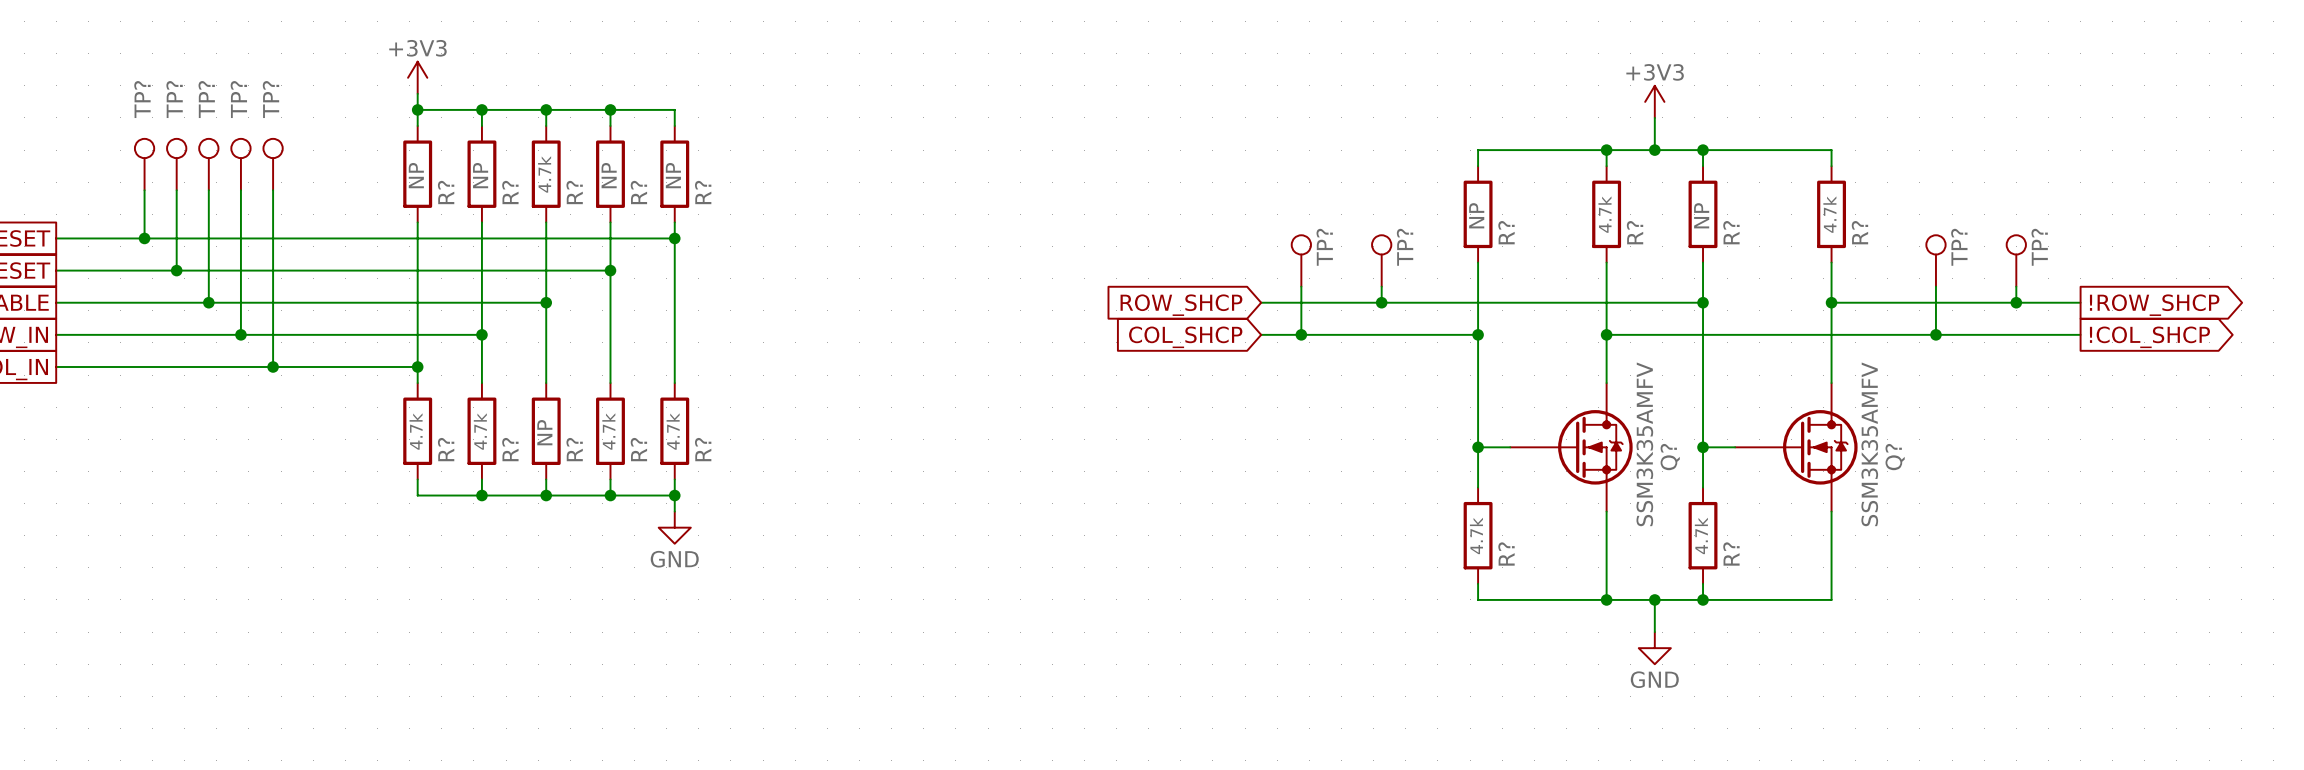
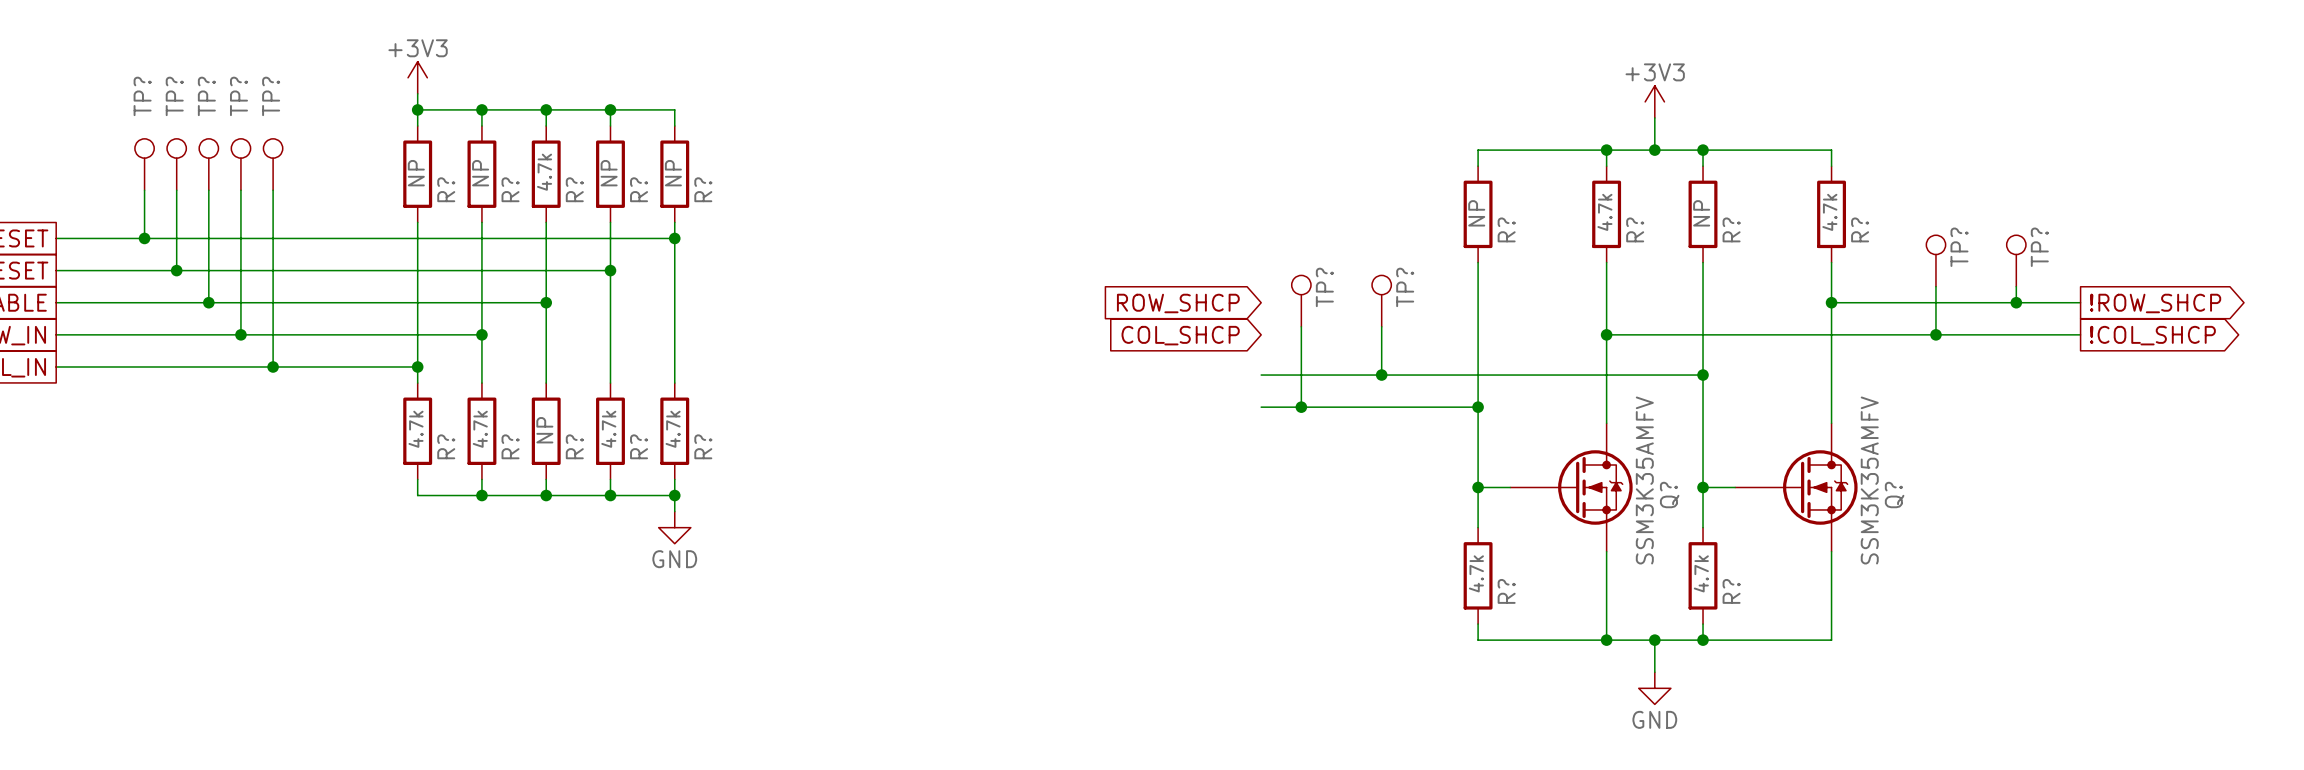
TP? position: (1301, 260) -> (1301, 301)
TP? position: (1381, 260) -> (1381, 301)
wire: (1261, 302) (1703, 302) -> (1261, 375) (1703, 375)
junction: (1381, 302) -> none
junction: (1703, 302) -> none
wire: none -> (1381, 326) (1381, 375)
wire: (1261, 334) (1478, 334) -> (1261, 407) (1478, 407)
wire: none -> (1301, 334) (1301, 407)
junction: (1301, 334) -> none
junction: (1478, 334) -> none
junction: none -> (1381, 375)
junction: none -> (1703, 375)
junction: none -> (1301, 407)
junction: none -> (1478, 407)
wire: (1478, 447) (1510, 447) -> none
junction: (1478, 447) -> none
Q? position: (1571, 447) -> (1571, 487)
wire: (1703, 447) (1735, 447) -> none
junction: (1703, 447) -> none
Q? position: (1796, 447) -> (1796, 487)
junction: none -> (1478, 487)
wire: none -> (1510, 487) (1478, 487) (1478, 527)
junction: none -> (1703, 487)
wire: none -> (1735, 487) (1703, 487) (1703, 527)
R? position: (1478, 535) -> (1478, 575)
R? position: (1703, 535) -> (1703, 575)
wire: (1478, 583) (1478, 599) (1831, 599) -> (1478, 624) (1478, 640) (1831, 640) (1831, 599)
wire: (1703, 583) (1703, 599) -> (1703, 624) (1703, 640)
wire: none -> (1606, 599) (1606, 640)
junction: (1606, 599) -> none
wire: (1654, 599) (1654, 632) -> (1654, 640) (1654, 672)
junction: (1654, 599) -> none
junction: (1703, 599) -> none
junction: none -> (1606, 640)
junction: none -> (1654, 640)
junction: none -> (1703, 640)
power symbol position: GND (1654, 648) -> GND (1654, 688)

